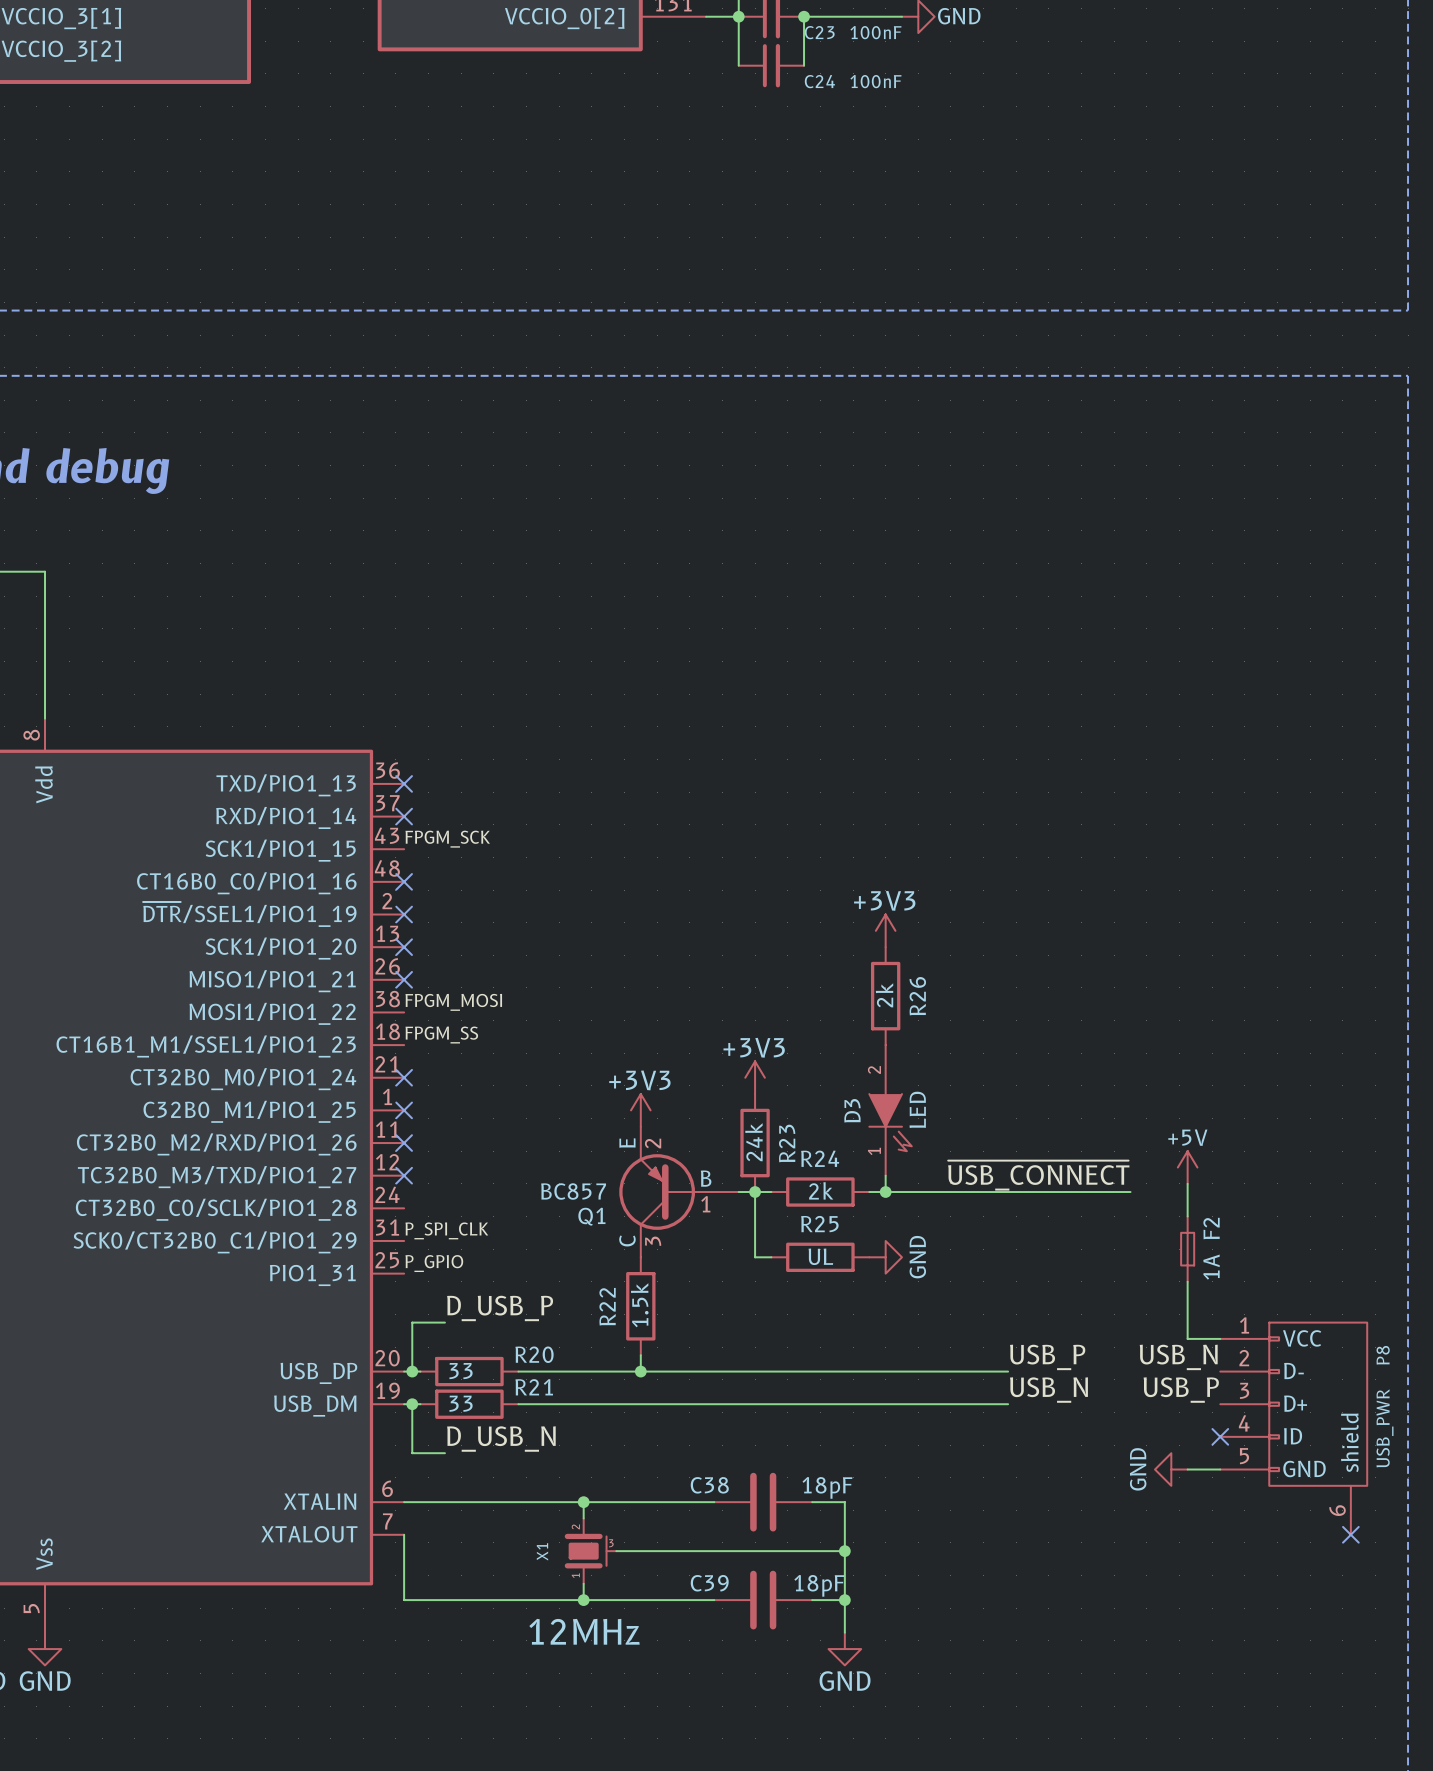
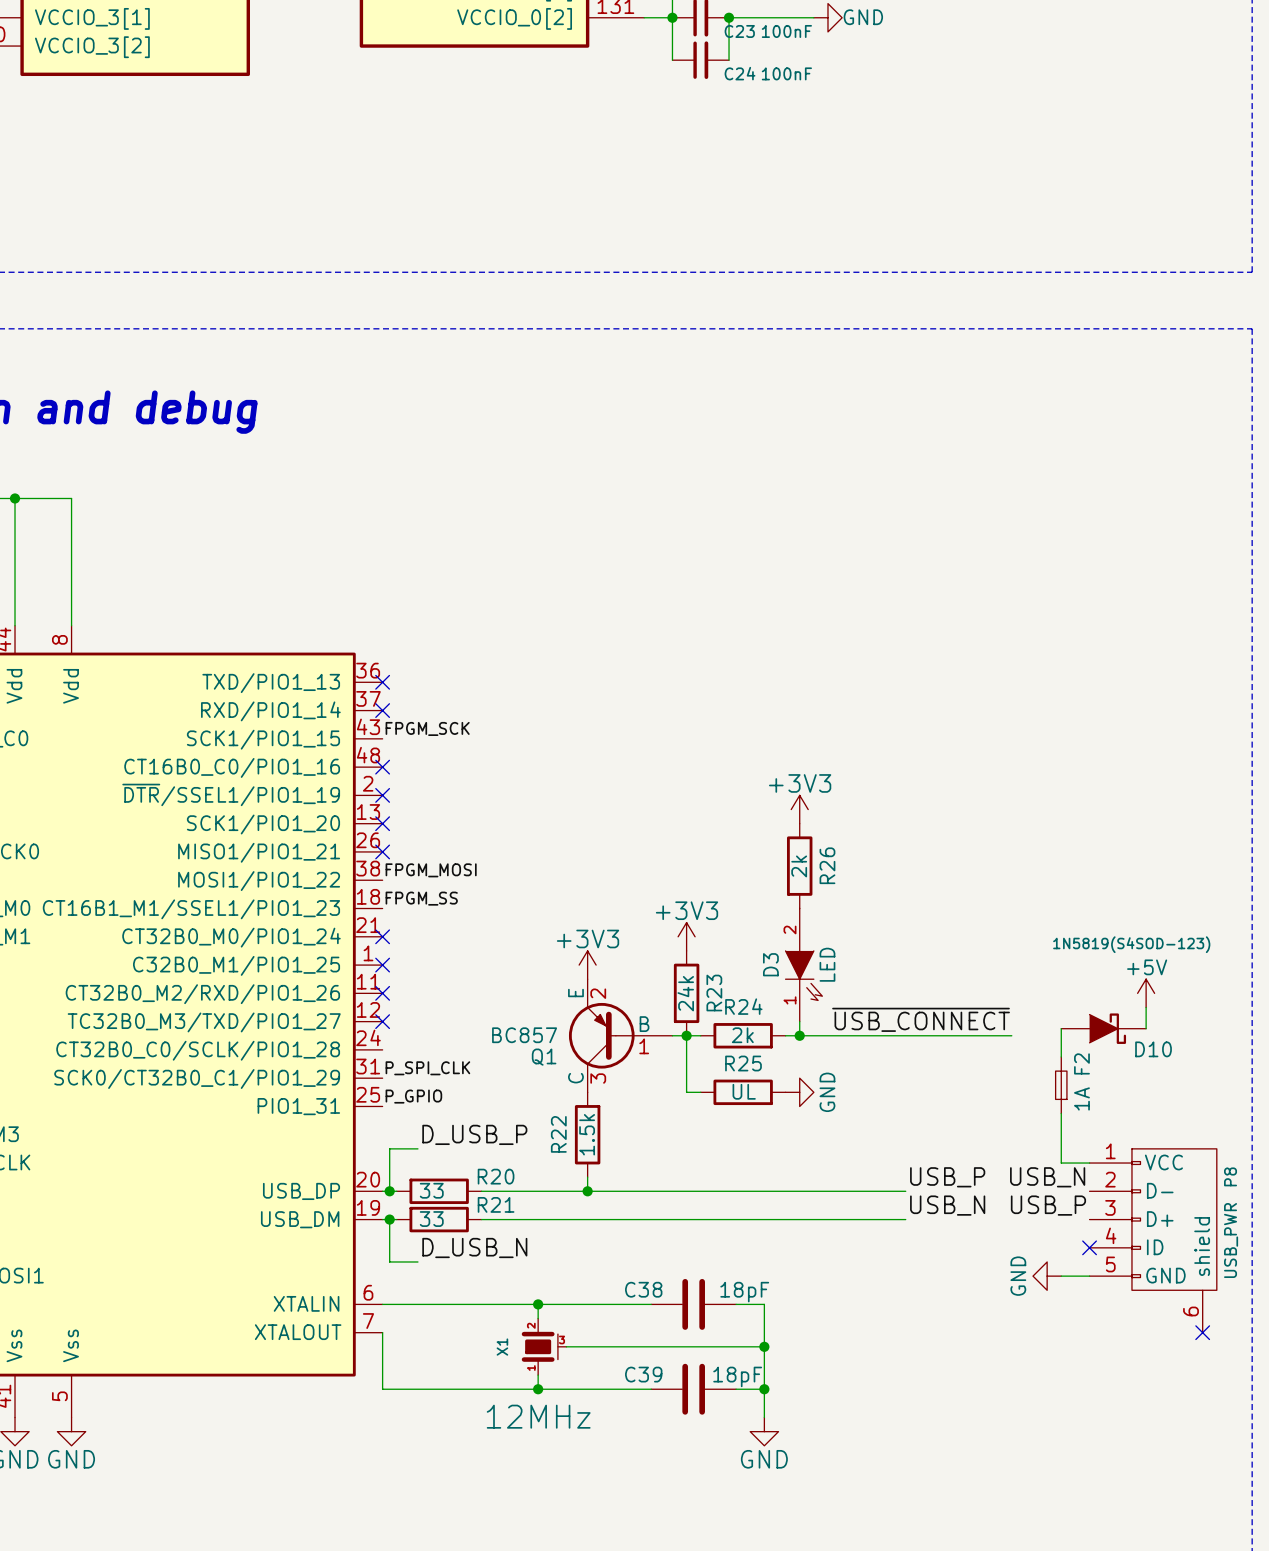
wire: none -> (1146, 1007) (1146, 1028)
power symbol position: +5V (1187, 1167) -> +5V (1146, 993)
D10: none -> 1N5819(S4SOD-123) (1103, 1028)

